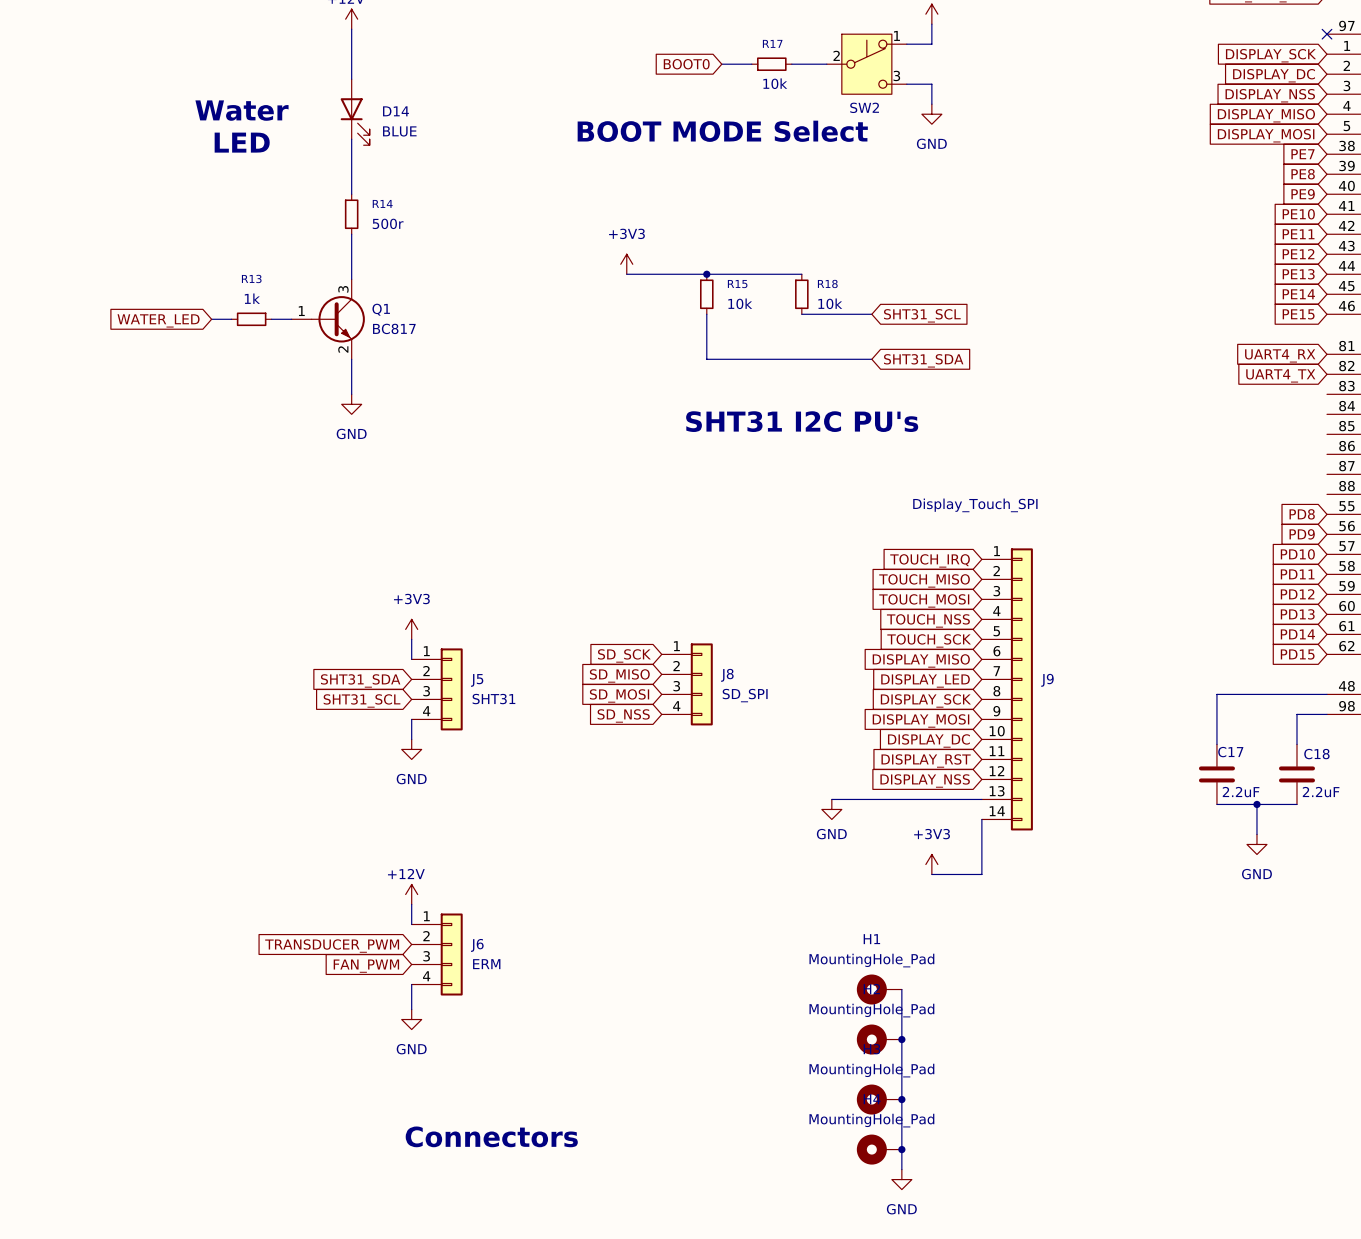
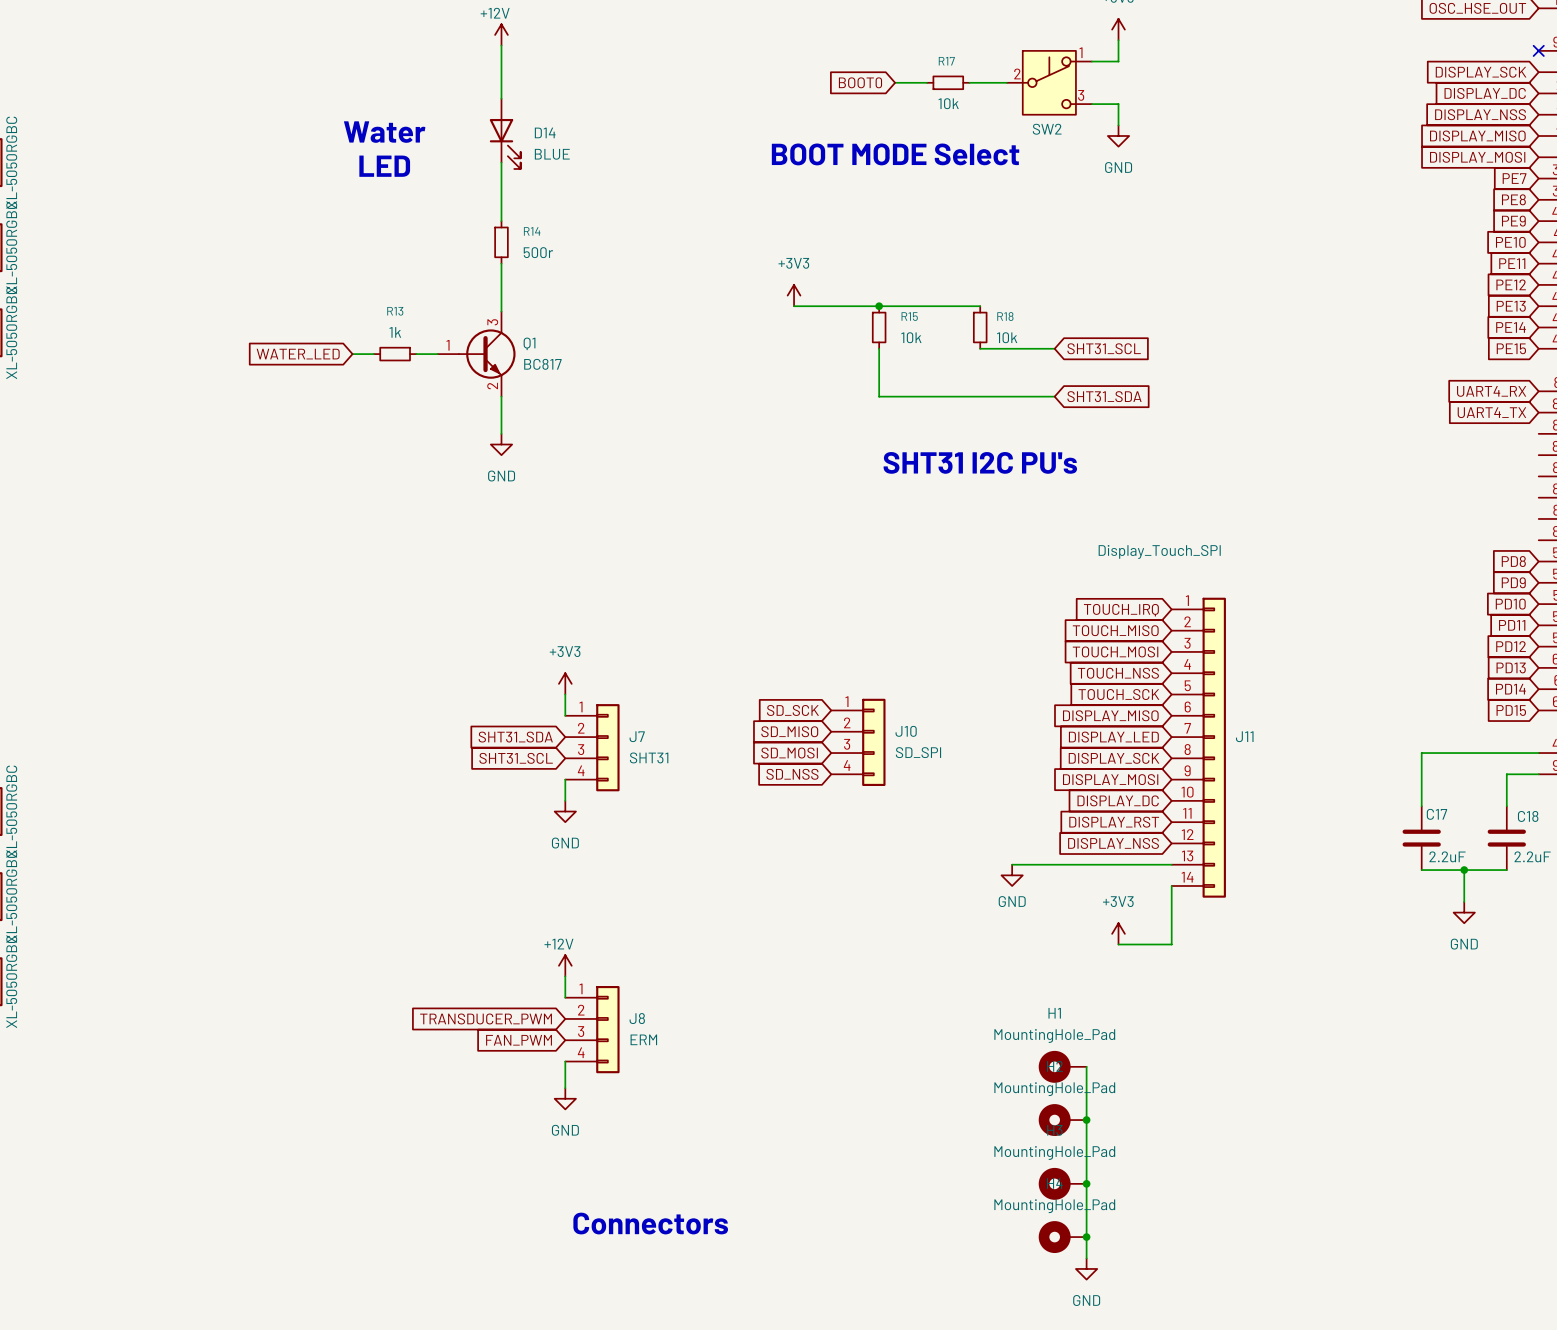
J8 name: J8 (727, 675) -> J10 (906, 731)
J5 name: J5 (477, 680) -> J7 (637, 736)
J9 name: J9 (1047, 680) -> J11 (1244, 736)
J6 name: J6 (477, 945) -> J8 (637, 1018)

